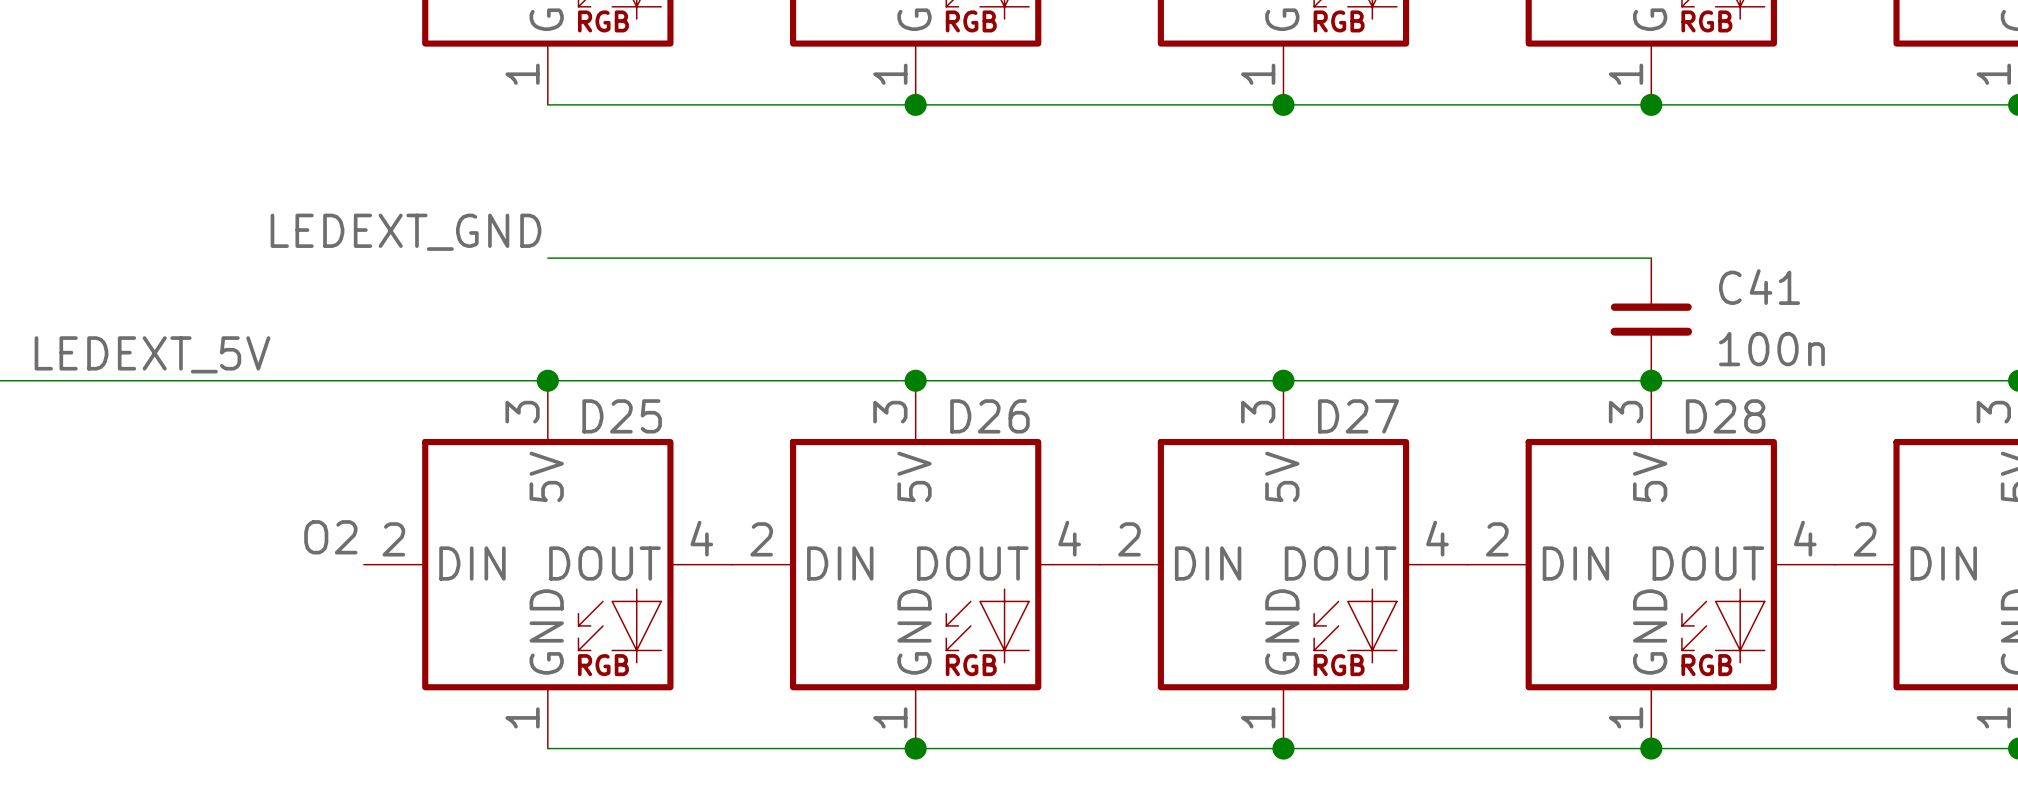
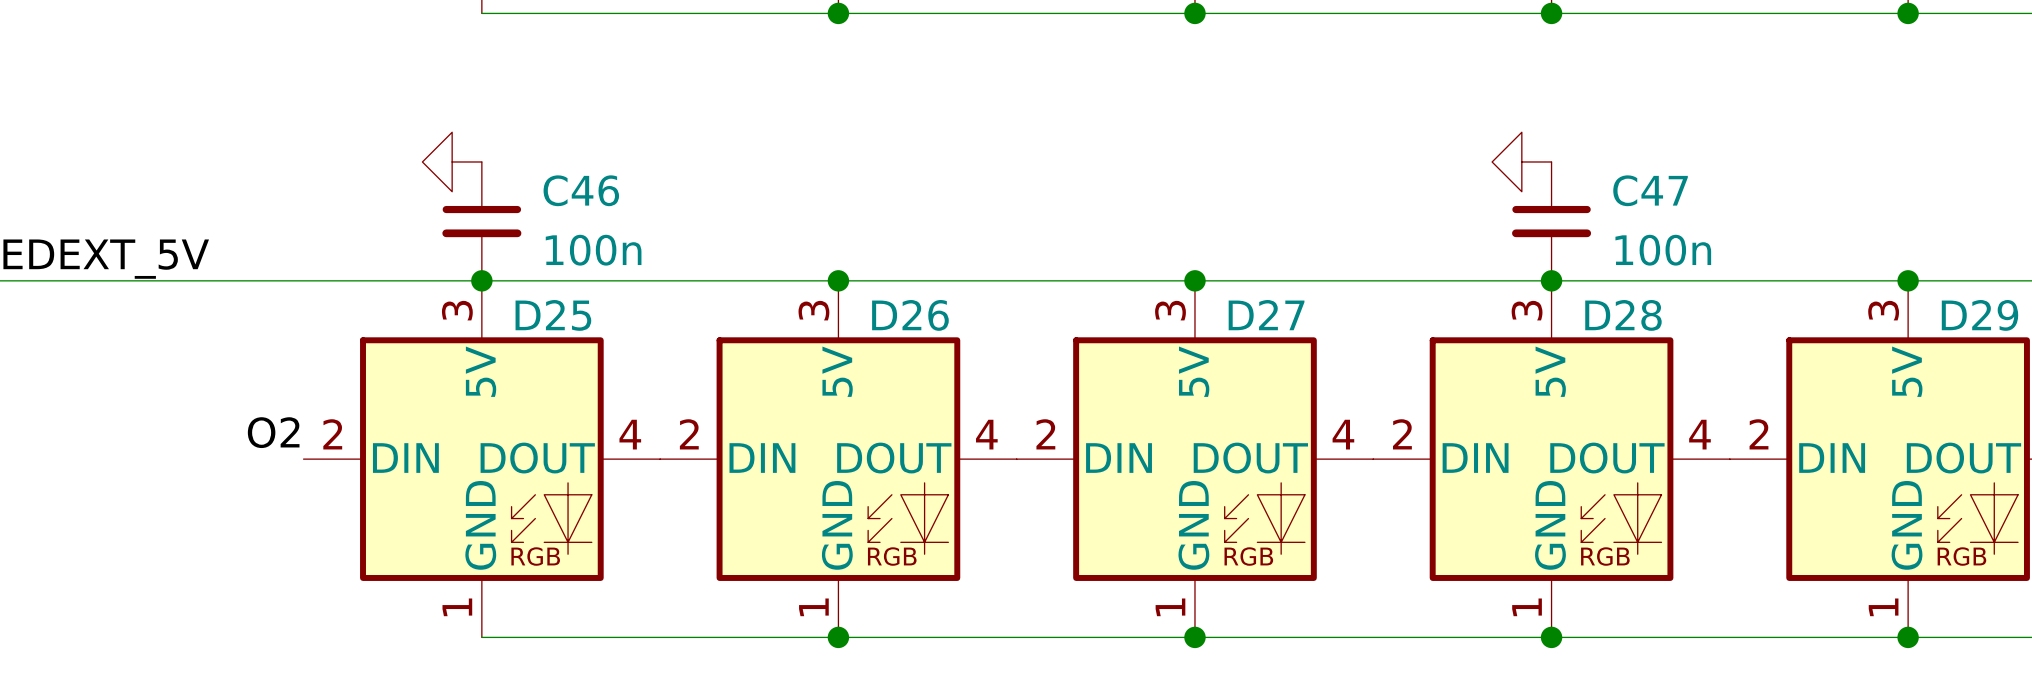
label: LEDEXT_GND (406, 232) -> none
power symbol: none -> (452, 161)
wire: (547, 258) (1651, 258) -> none
power symbol: none -> (1521, 161)
C41 name: C41 (1759, 287) -> C47 (1650, 190)
C46: none -> 100n (481, 221)

